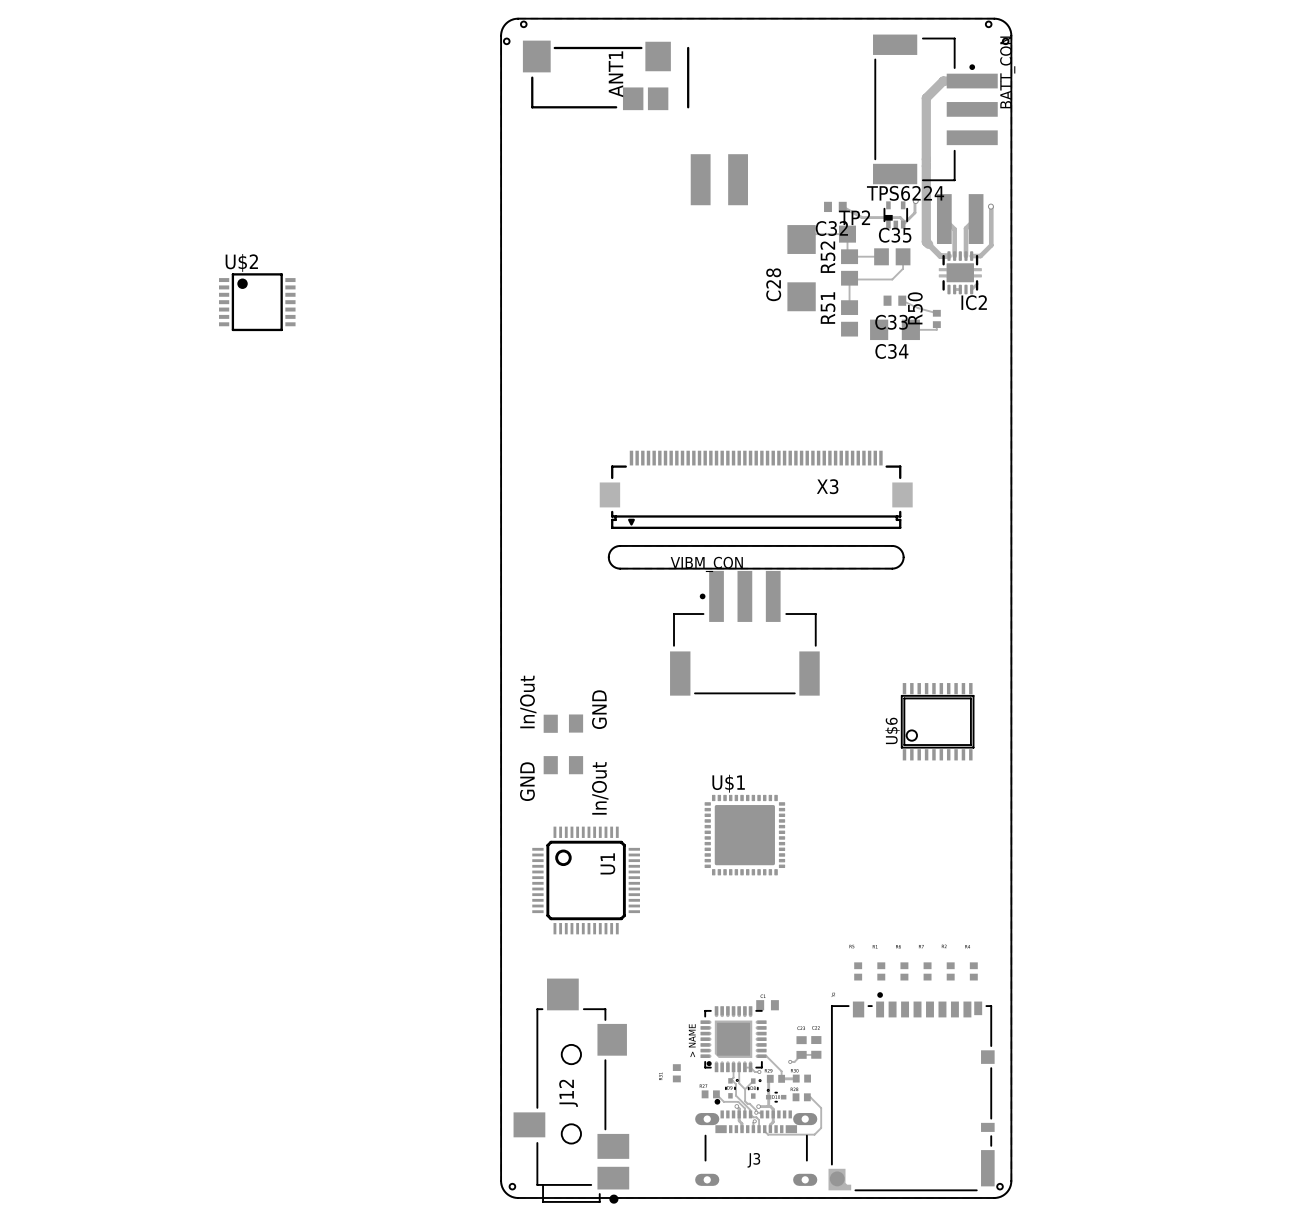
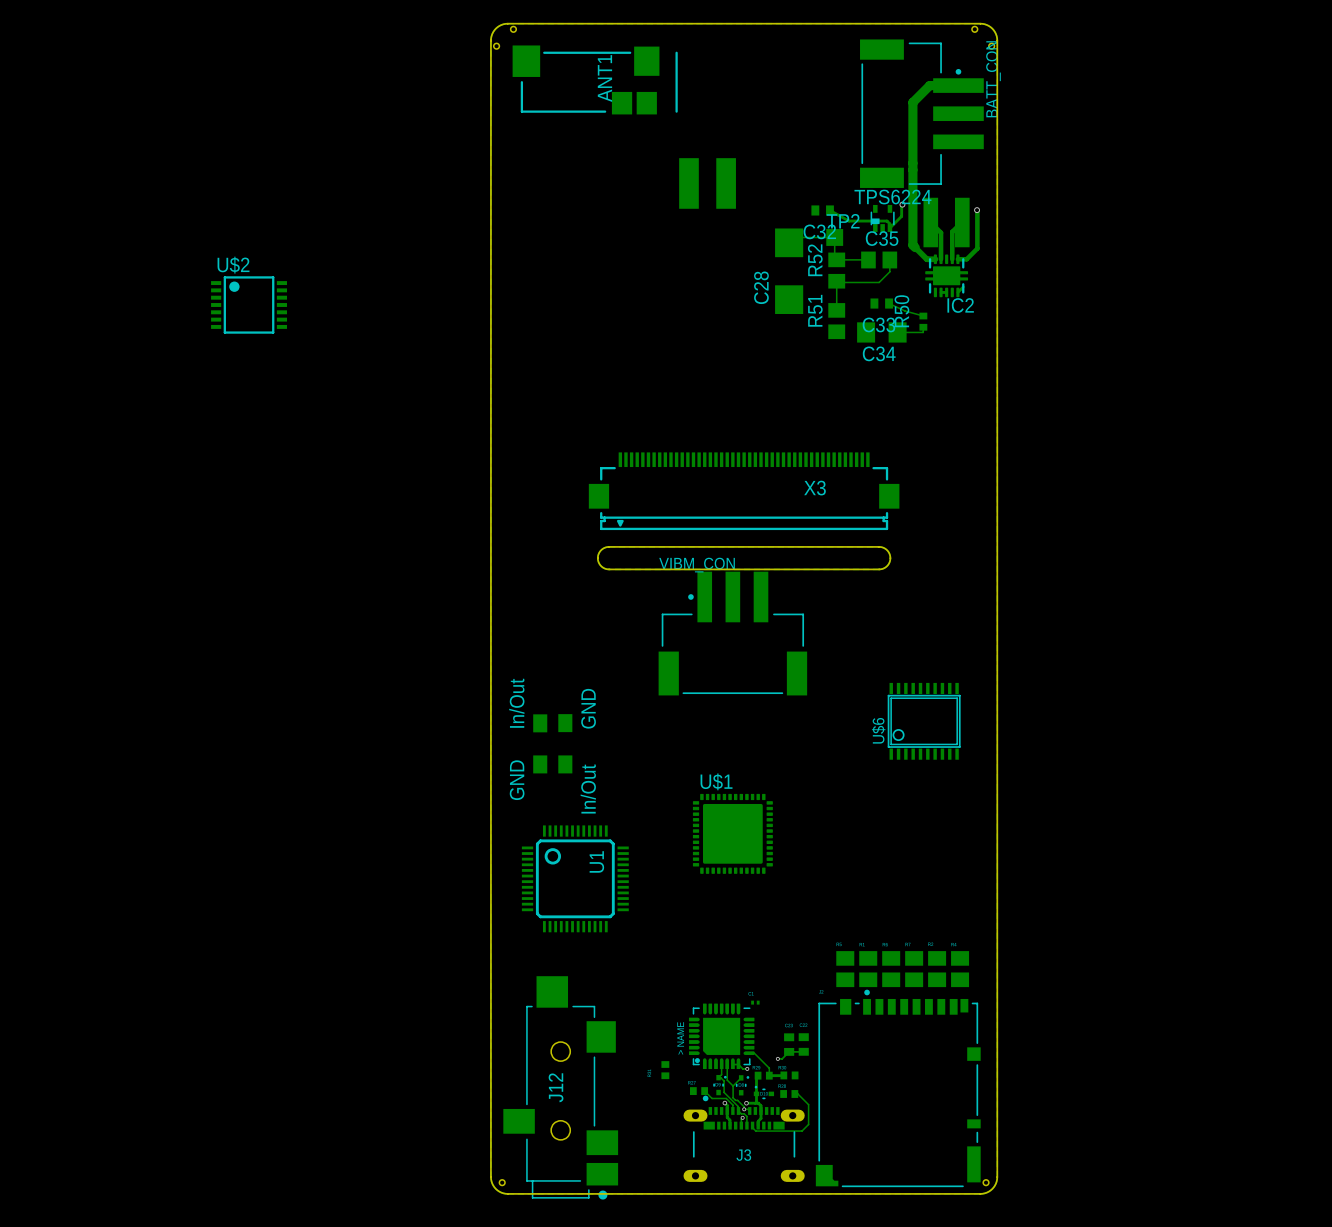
part footprint: [854, 962, 863, 981] -> [836, 951, 855, 988]
part footprint: [877, 962, 886, 981] -> [859, 951, 878, 988]
part footprint: [900, 962, 909, 981] -> [882, 951, 901, 988]
part footprint: [923, 962, 932, 981] -> [905, 951, 924, 988]
part footprint: [946, 962, 955, 981] -> [928, 951, 947, 988]
part footprint: [969, 962, 978, 981] -> [951, 951, 970, 988]
part footprint: [756, 1000, 779, 1011] -> [751, 1000, 760, 1005]

